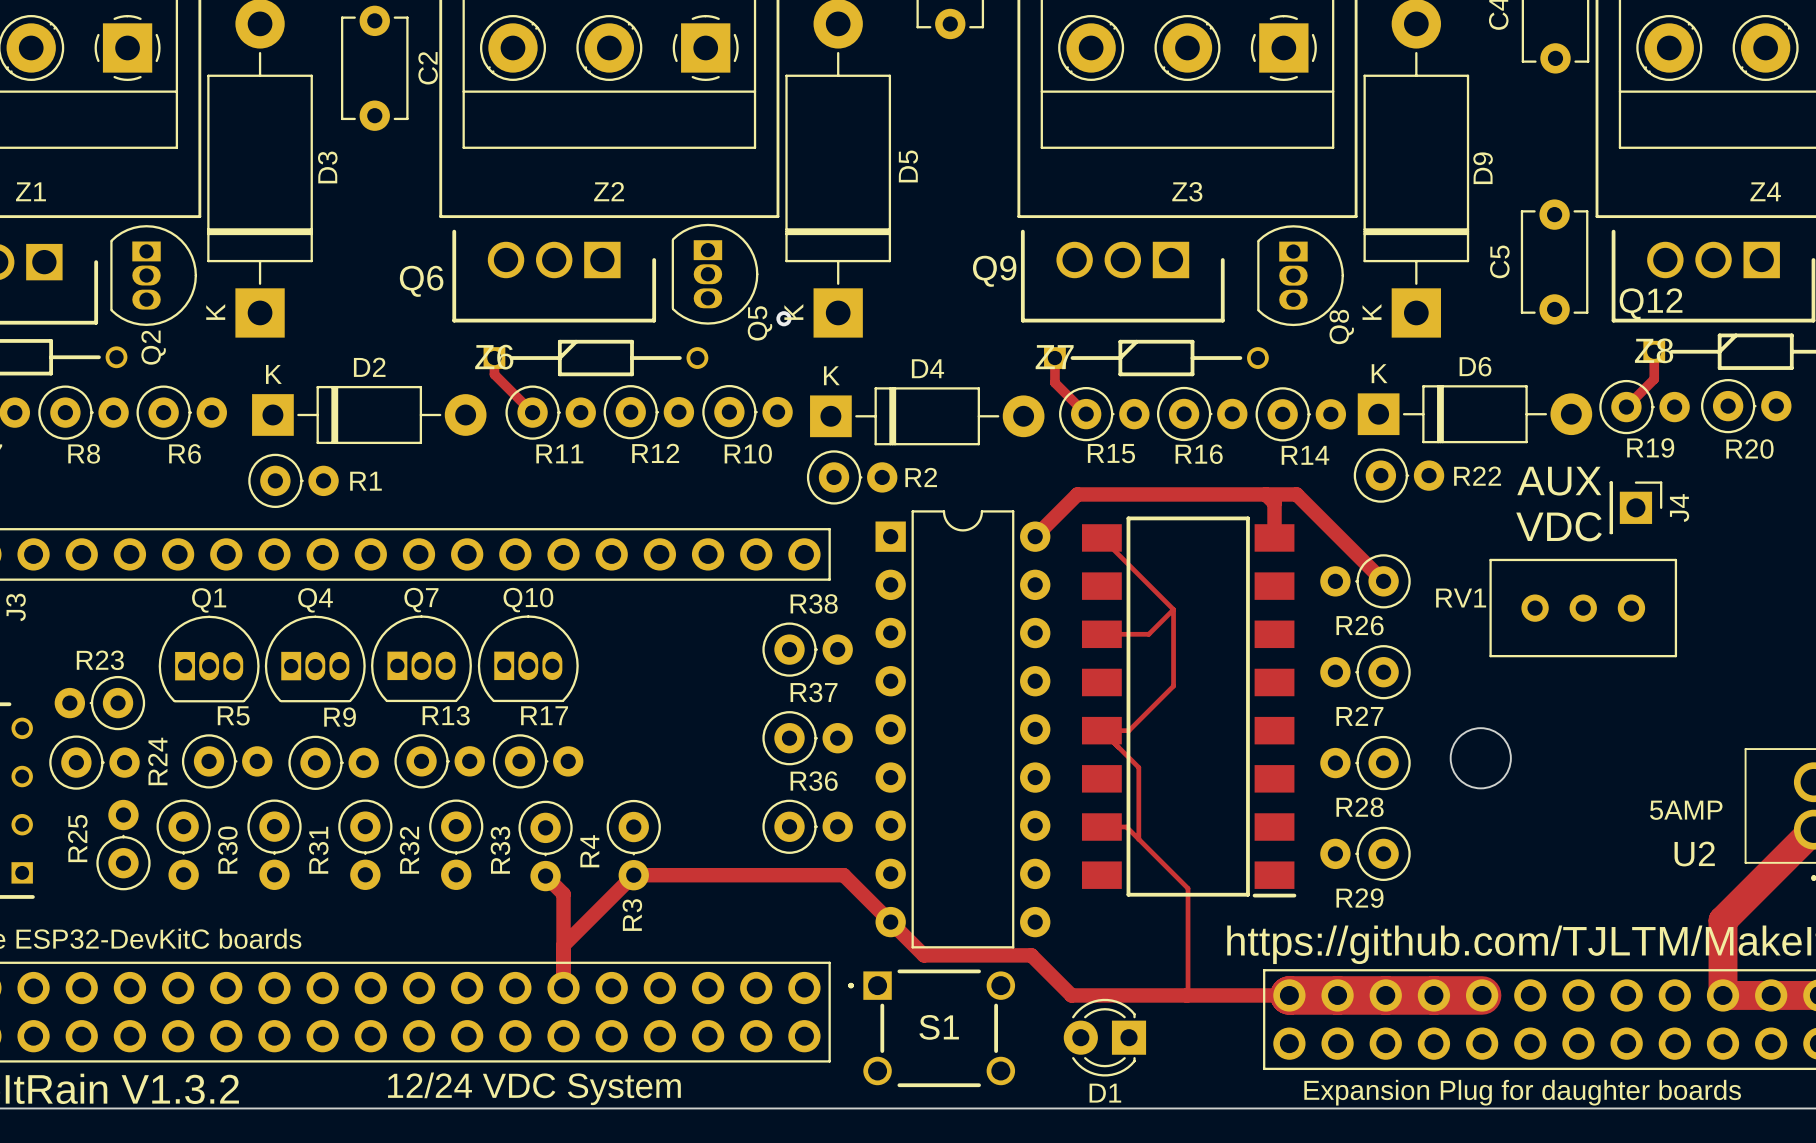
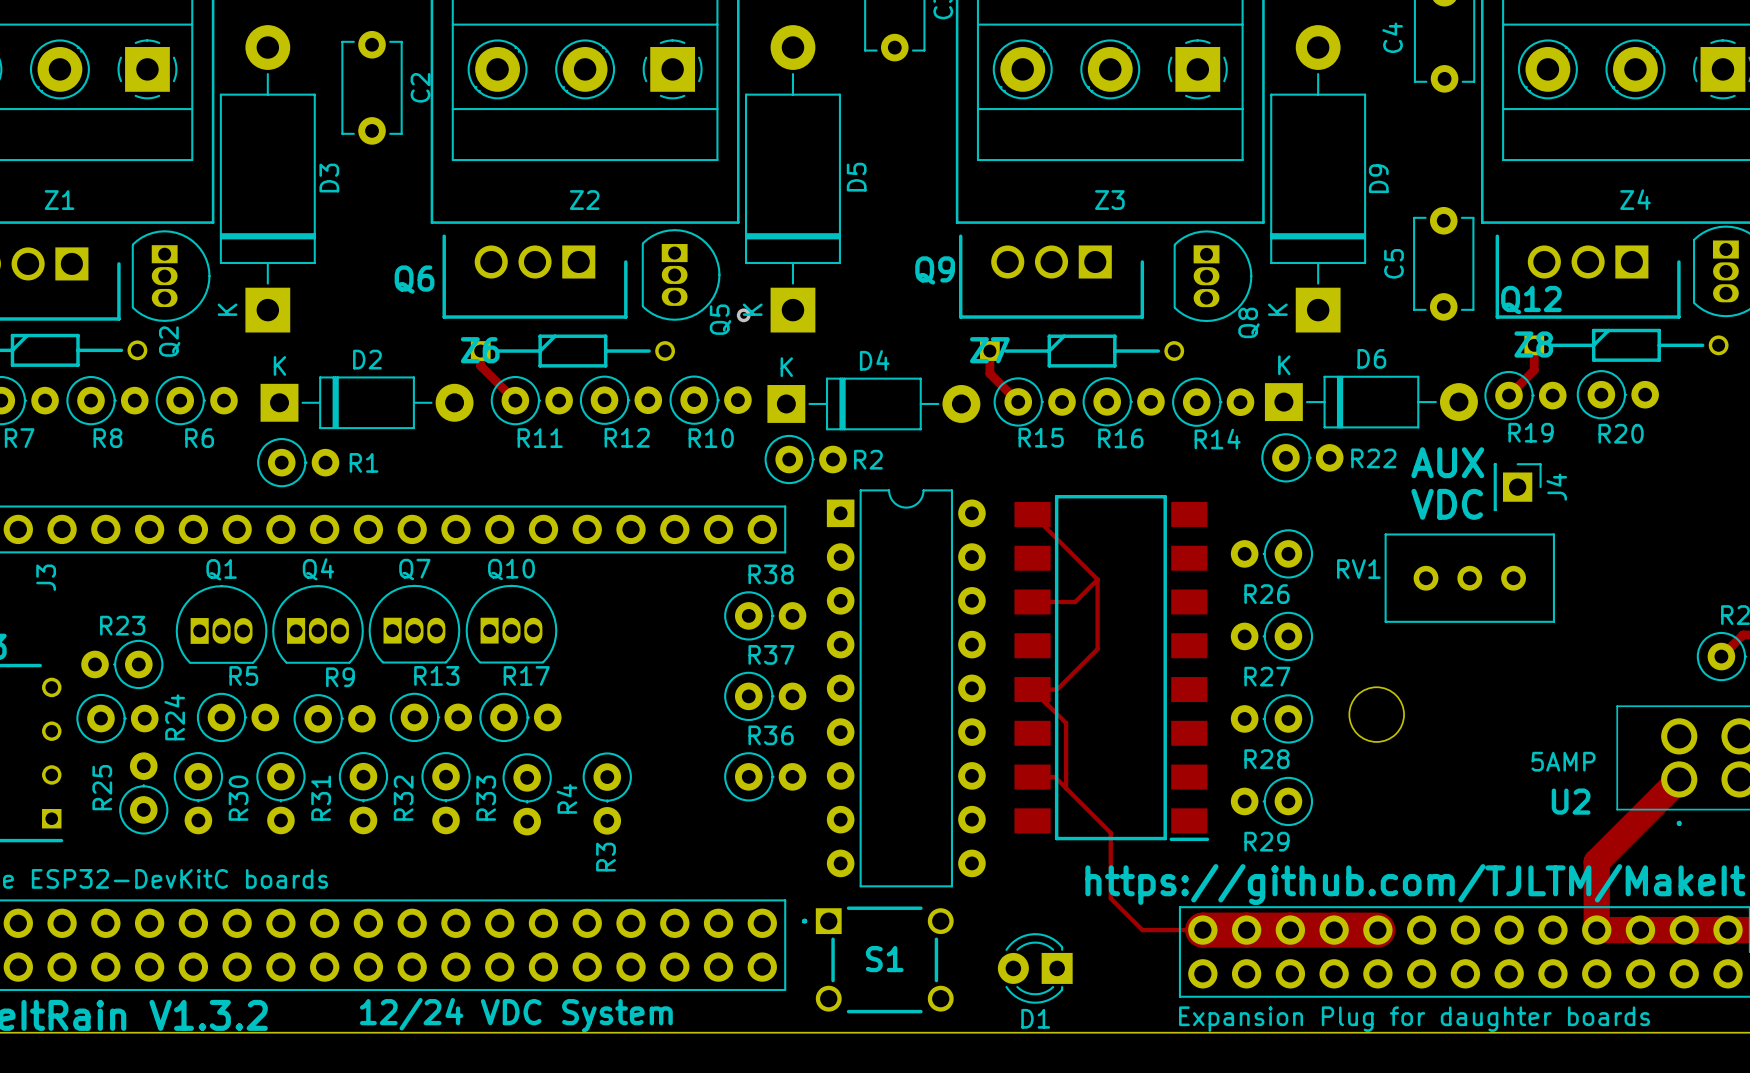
track: (1265, 494) (1274, 503) (1274, 537) -> none
track: (1035, 536) (1077, 494) (1296, 494) (1383, 581) -> none
track: (545, 876) (563, 894) (563, 988) -> none
track: (563, 945) (633, 875) (843, 875) (923, 955) (1031, 955) (1071, 995) (1222, 995) -> none
track: (1188, 960) (1186, 995) -> (1110, 898) (1142, 930)
track width: thick (1071, 995) (1289, 995) -> thin (1004, 930) (1202, 930)

